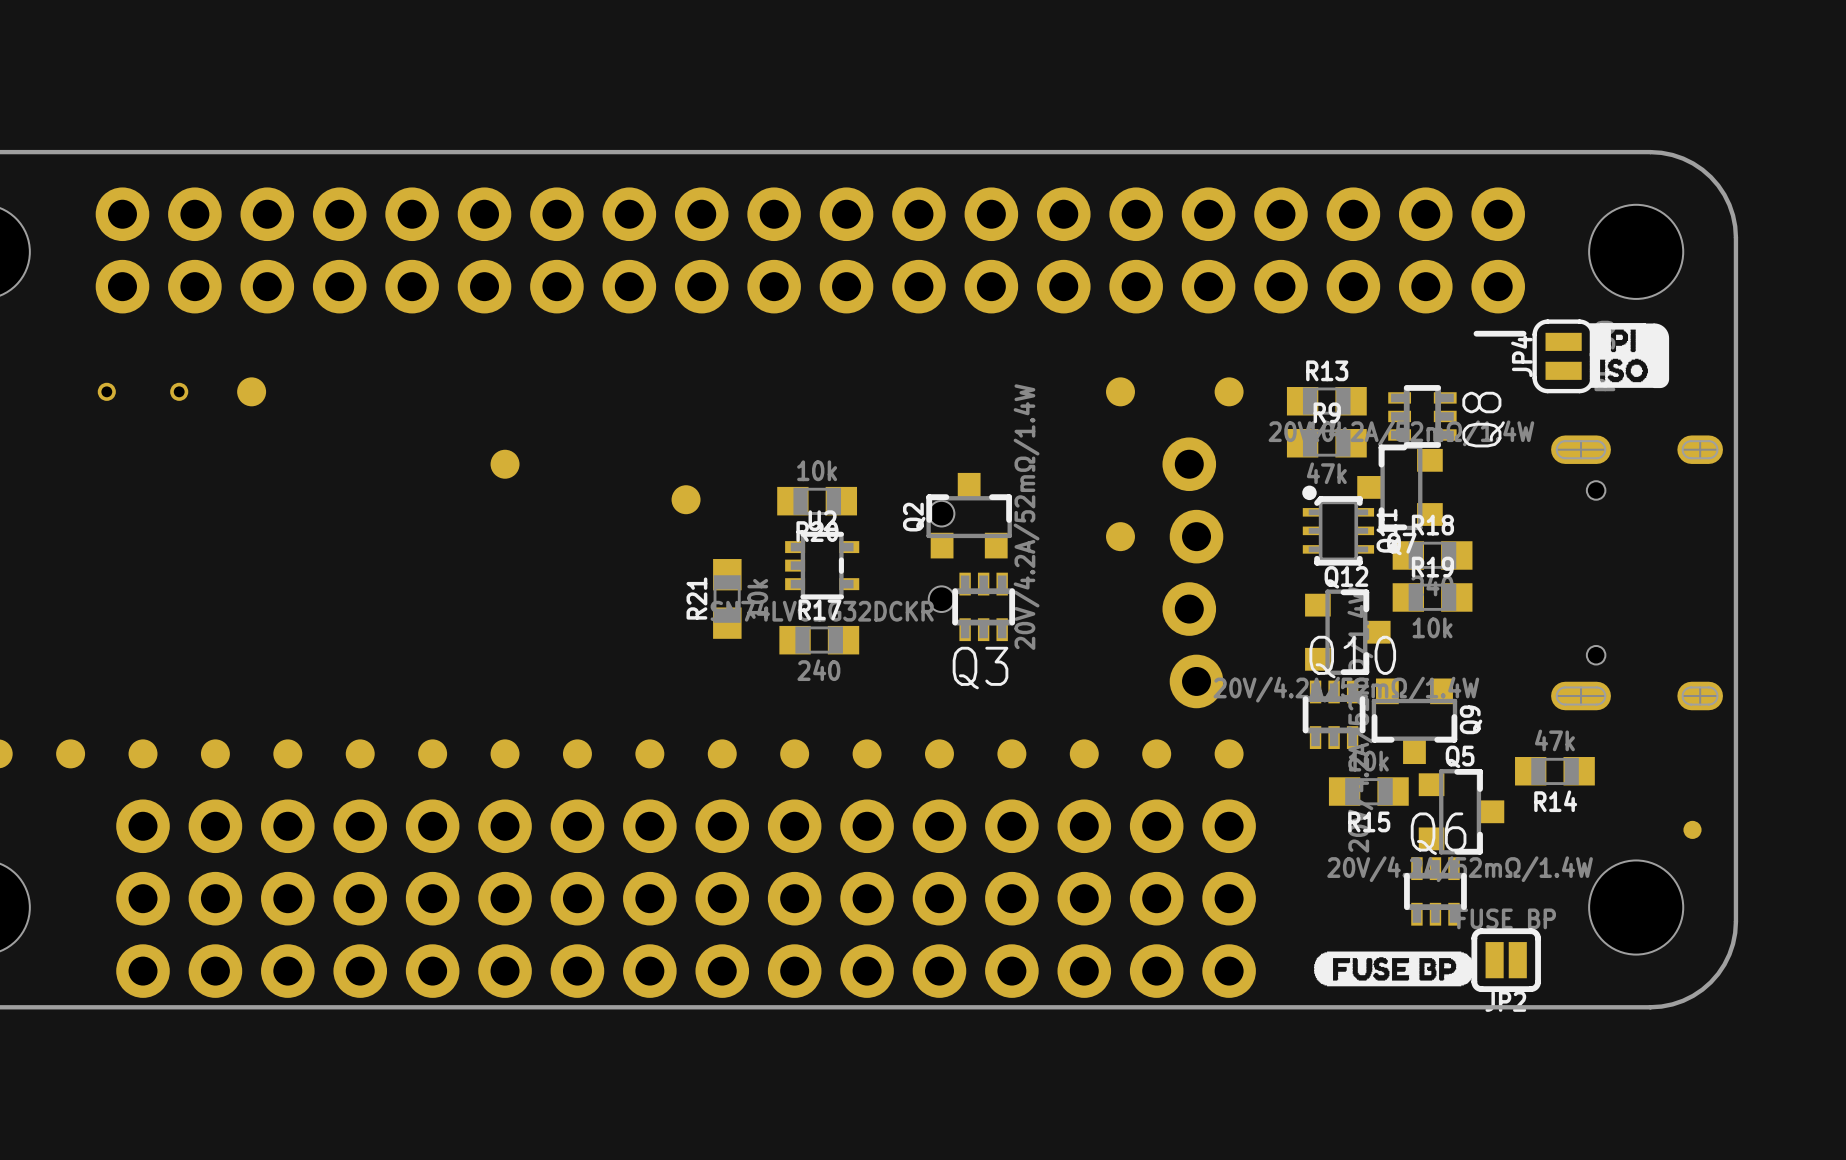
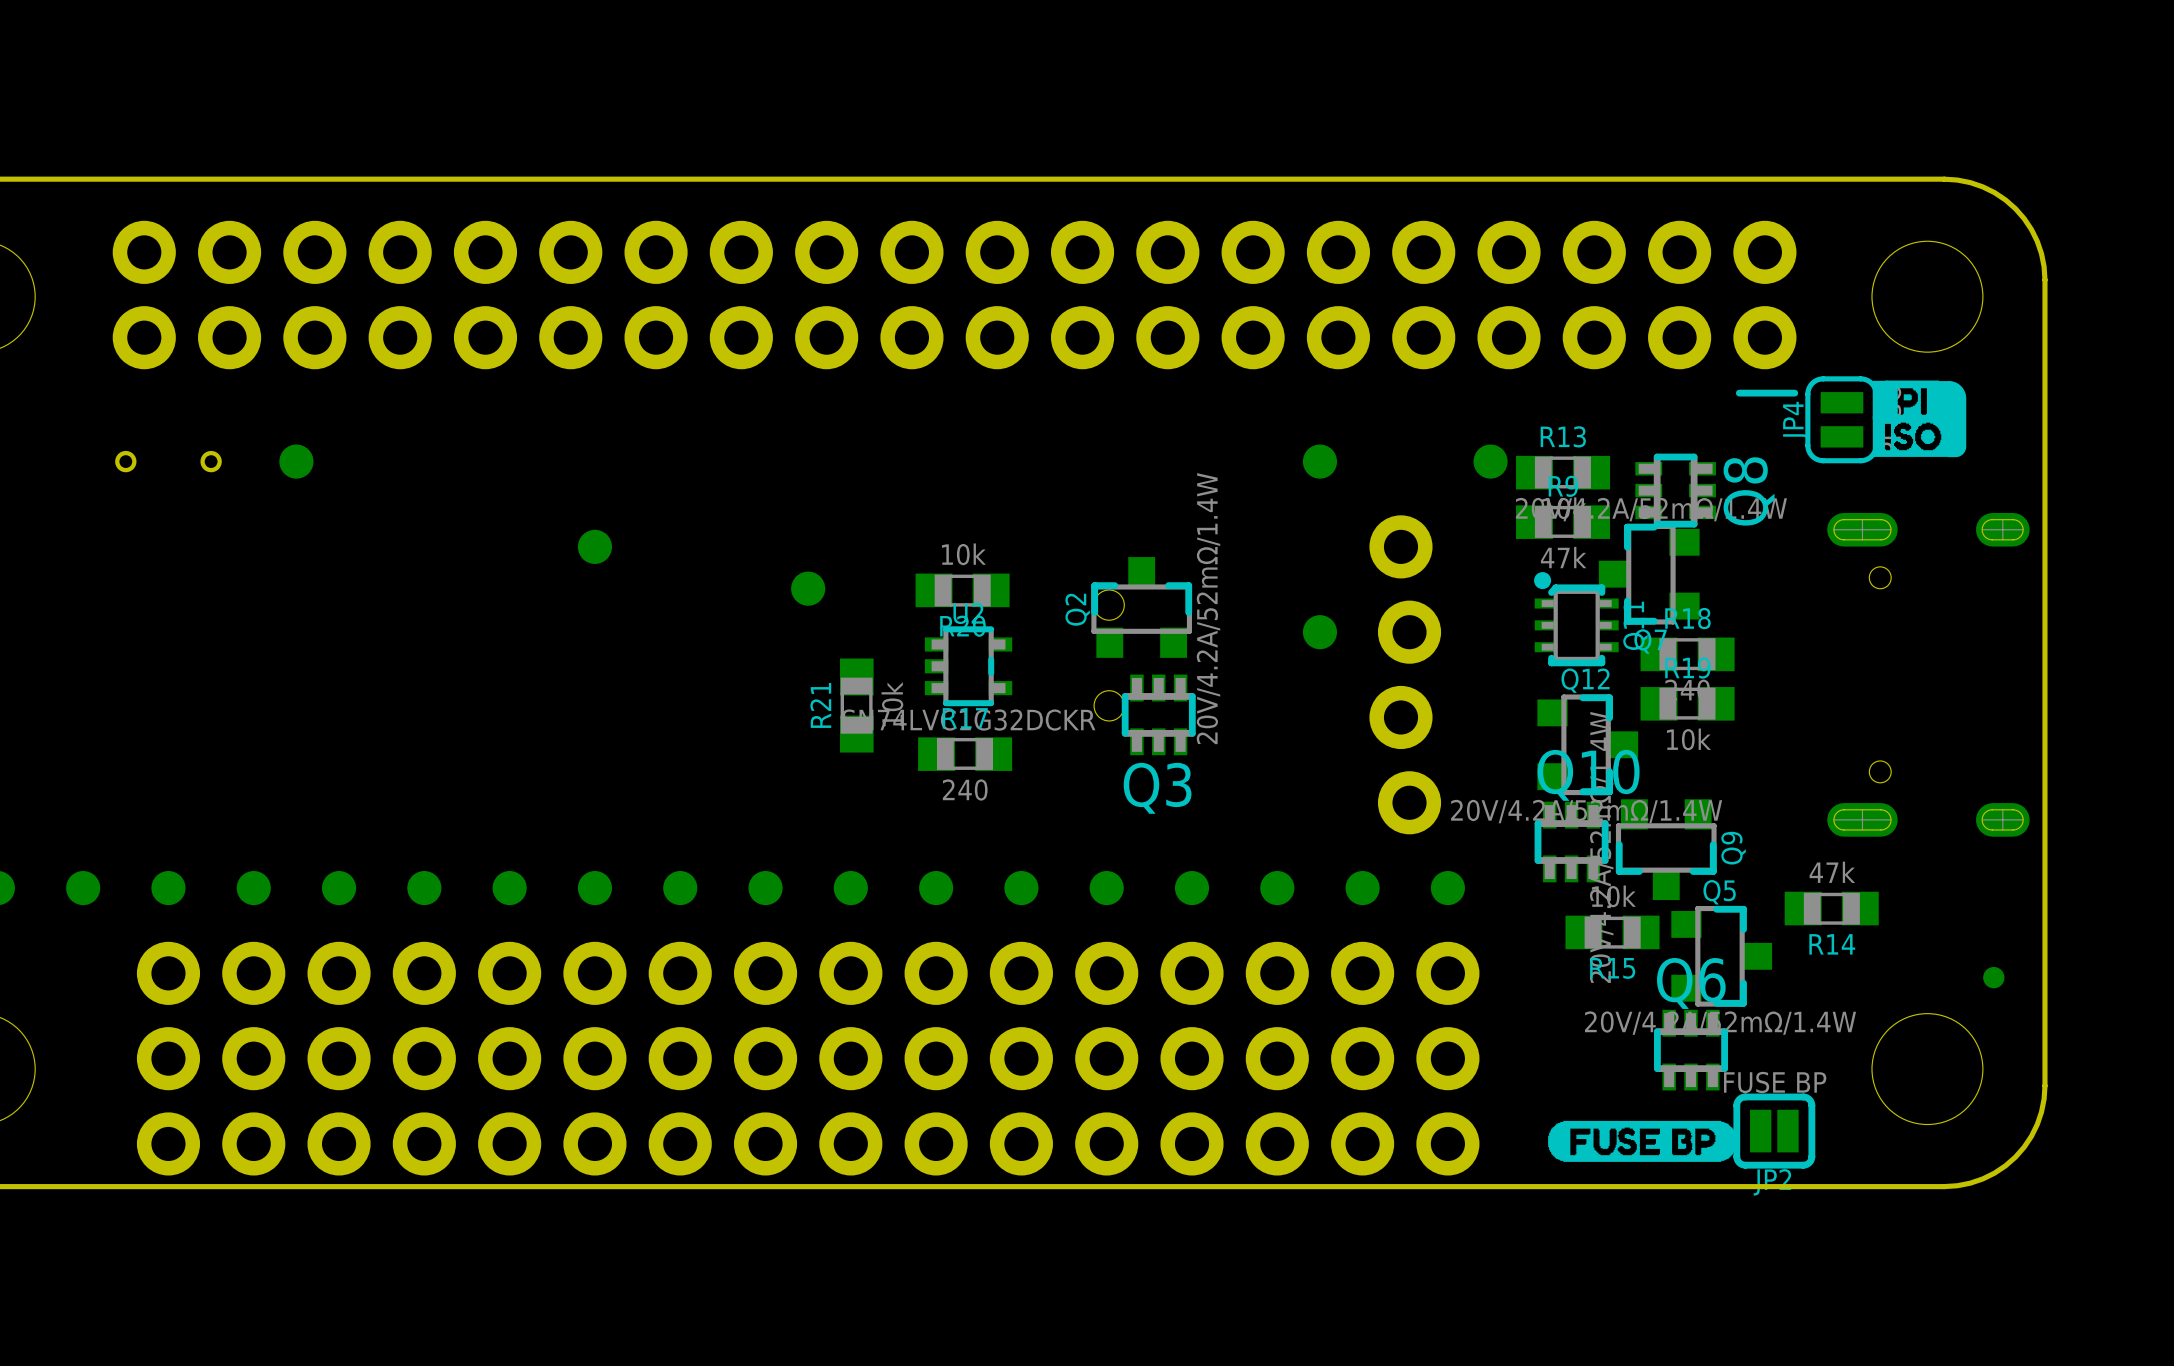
part position: (1229, 391) -> (1490, 461)

